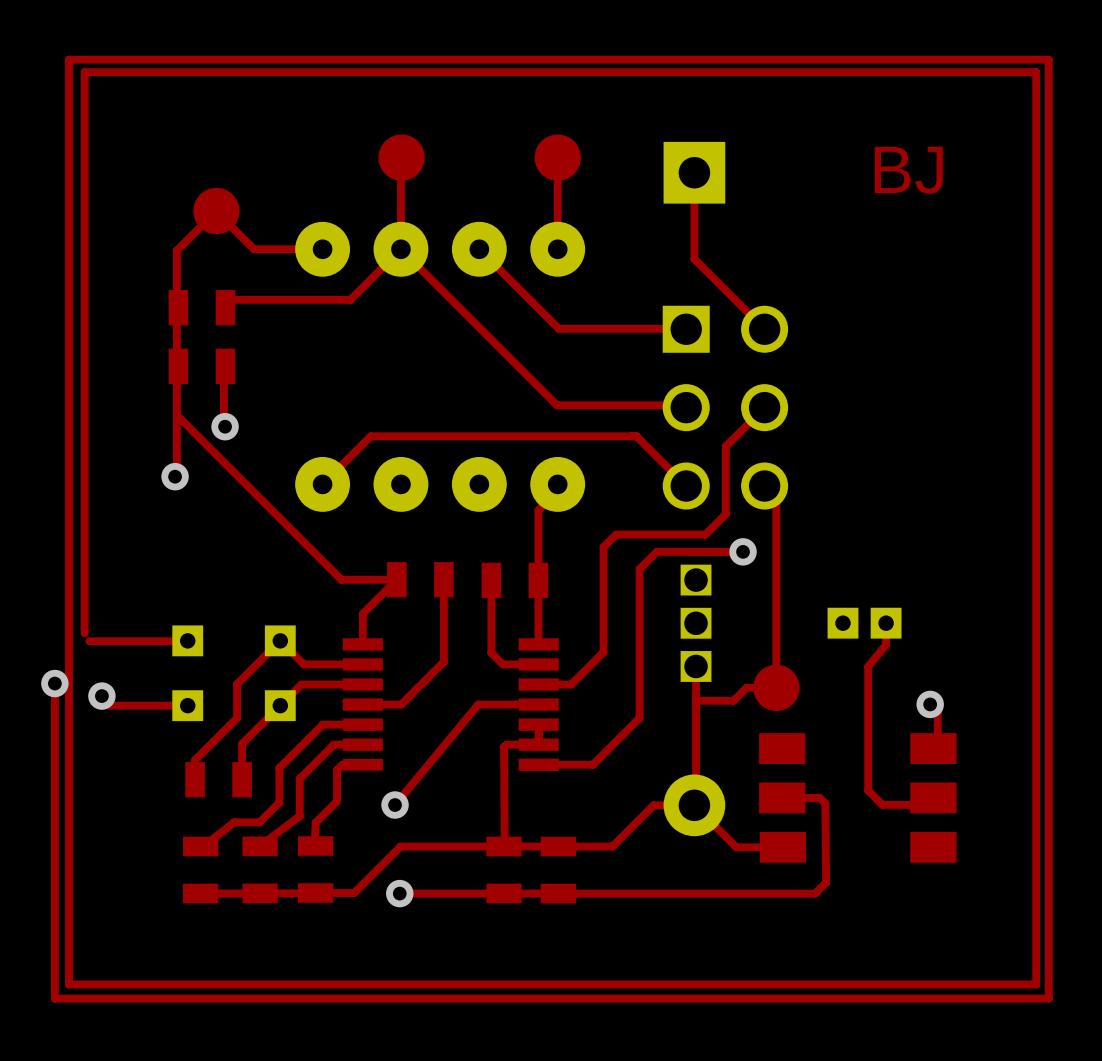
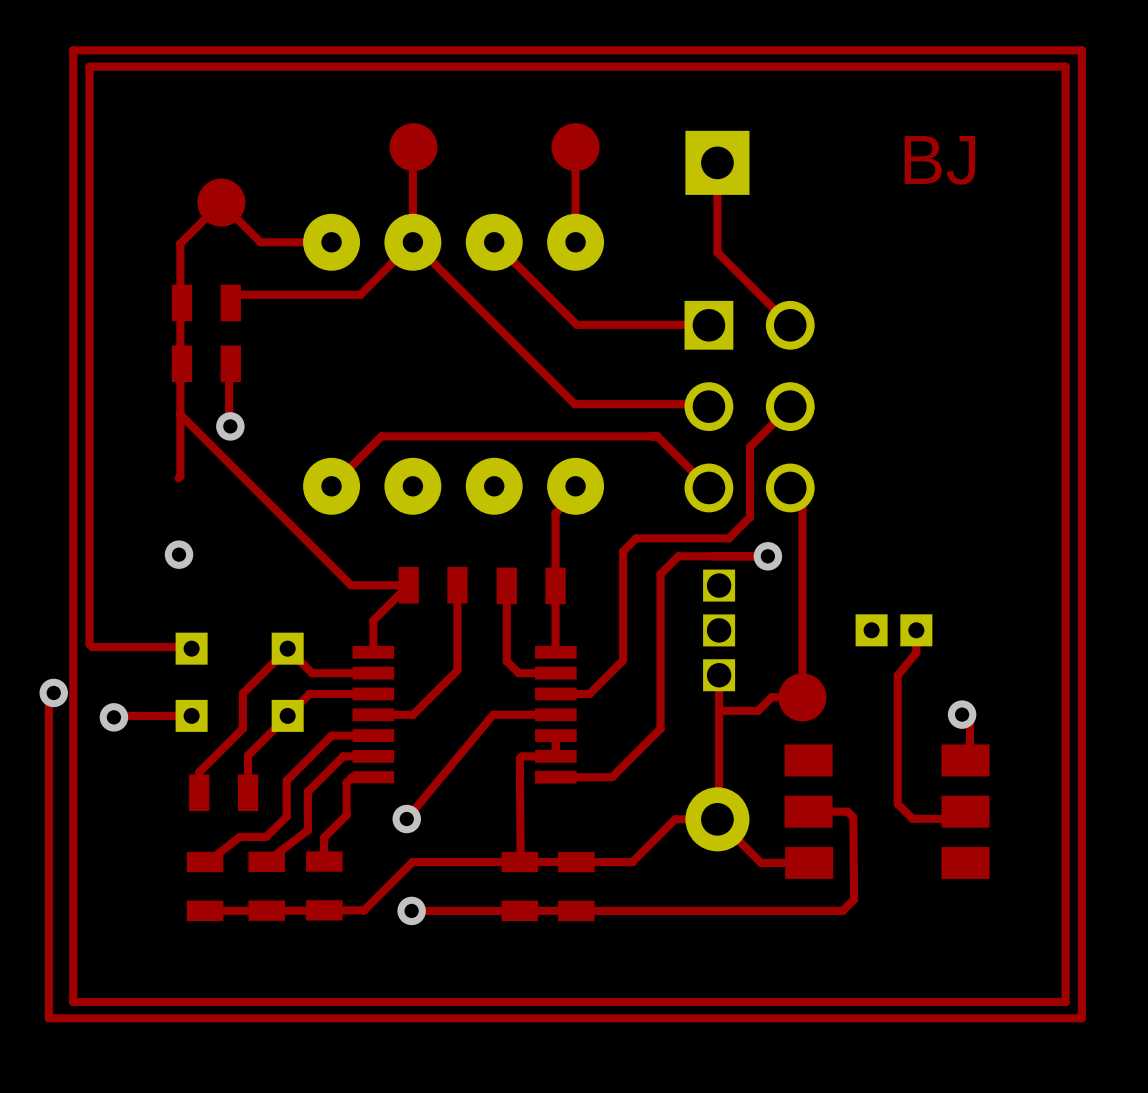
via position: (175, 476) -> (179, 554)
track: (84, 633) (84, 72) (1036, 72) (1036, 984) (68, 984) (68, 59) (1048, 59) (1048, 998) (54, 998) (54, 683) -> none
track: none -> (184, 647) (92, 647) (89, 644) (89, 66) (1065, 66) (1065, 1002) (73, 1002) (73, 50) (1081, 50) (1081, 1018) (48, 1018) (48, 692)
track: (89, 641) (187, 641) -> none
via position: (101, 696) -> (113, 717)

